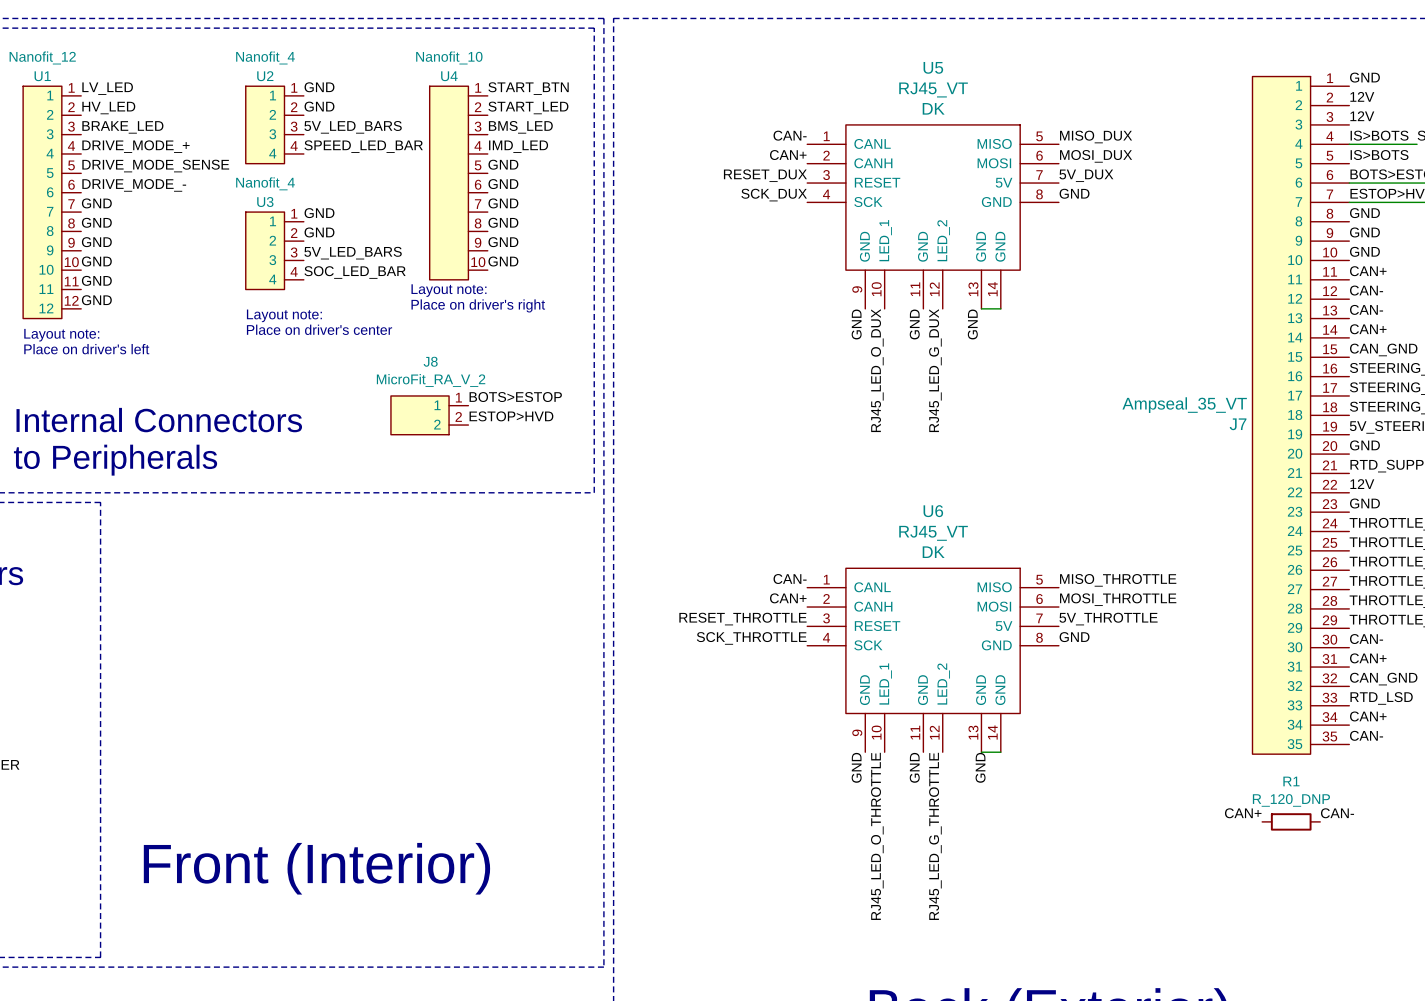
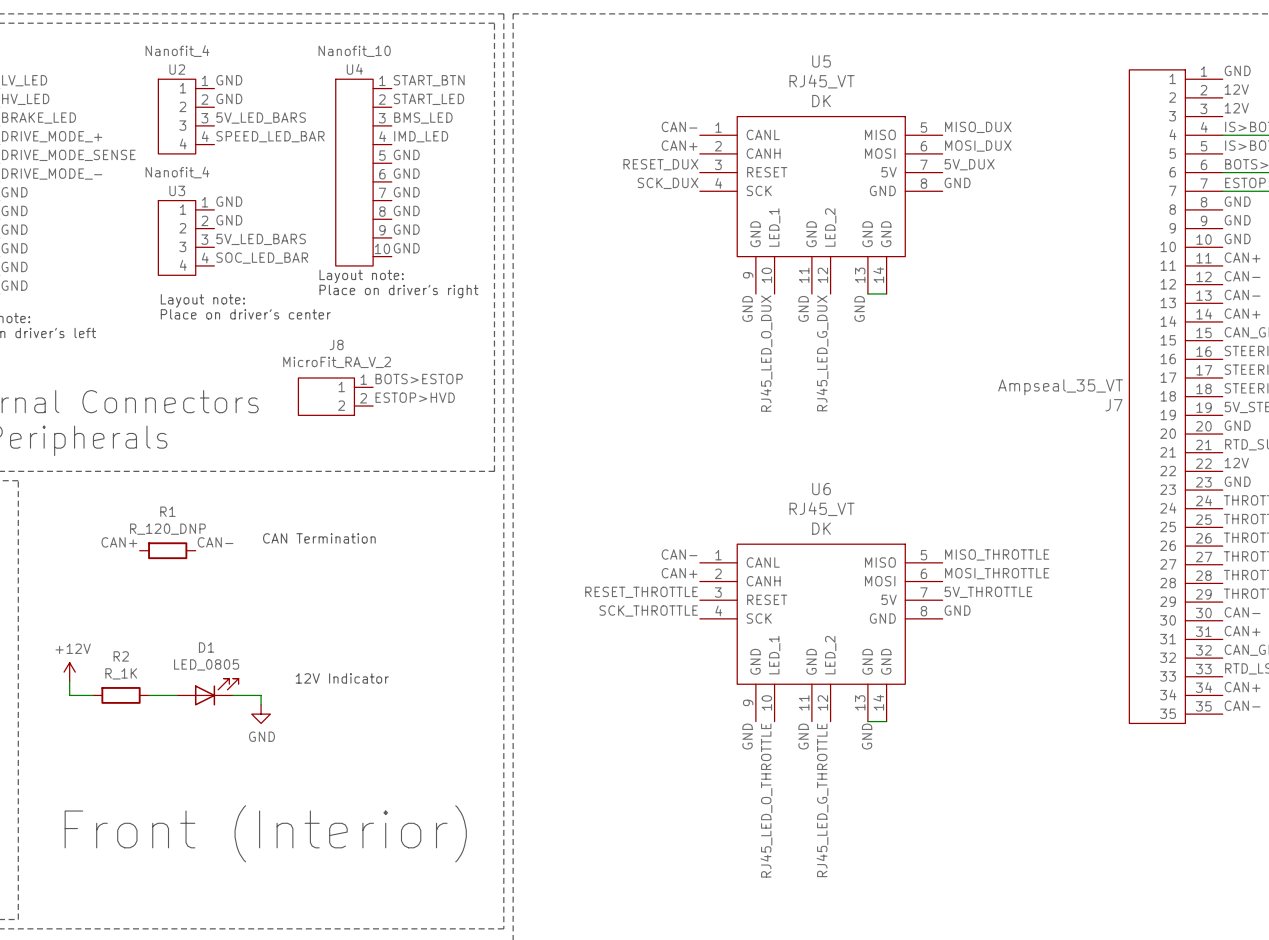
text: none -> CAN Termination (319, 538)
label: none -> CAN+ (119, 542)
label: none -> CAN- (215, 542)
power symbol: none -> +12V (69, 672)
text: none -> 12V Indicator (342, 678)
wire: none -> (69, 681) (69, 695) (93, 695)
D1: none -> LED_0805 (207, 692)
R2: none -> R_1K (121, 695)
wire: none -> (149, 695) (177, 695)
wire: none -> (233, 695) (261, 695) (261, 704)
power symbol: none -> GND (261, 714)
label: CAN+ (1243, 813) -> none
label: CAN- (1337, 813) -> none
R1 position: (1291, 821) -> (167, 550)

